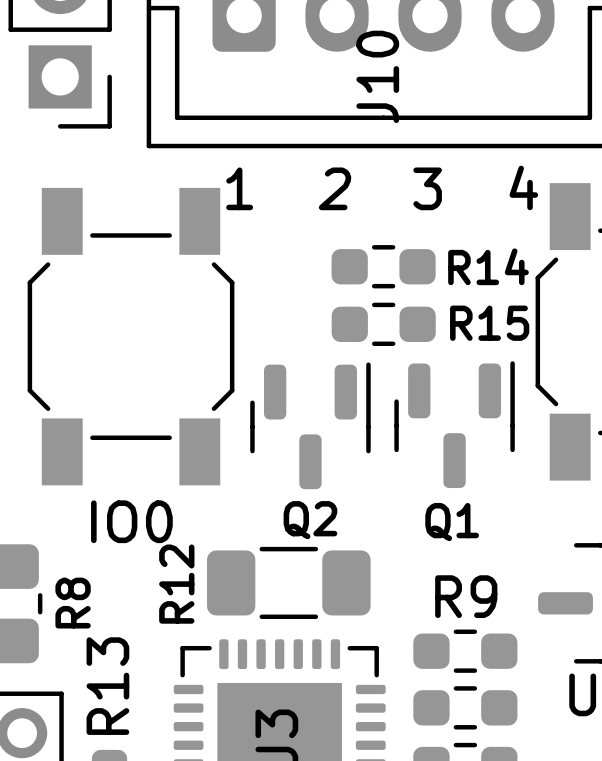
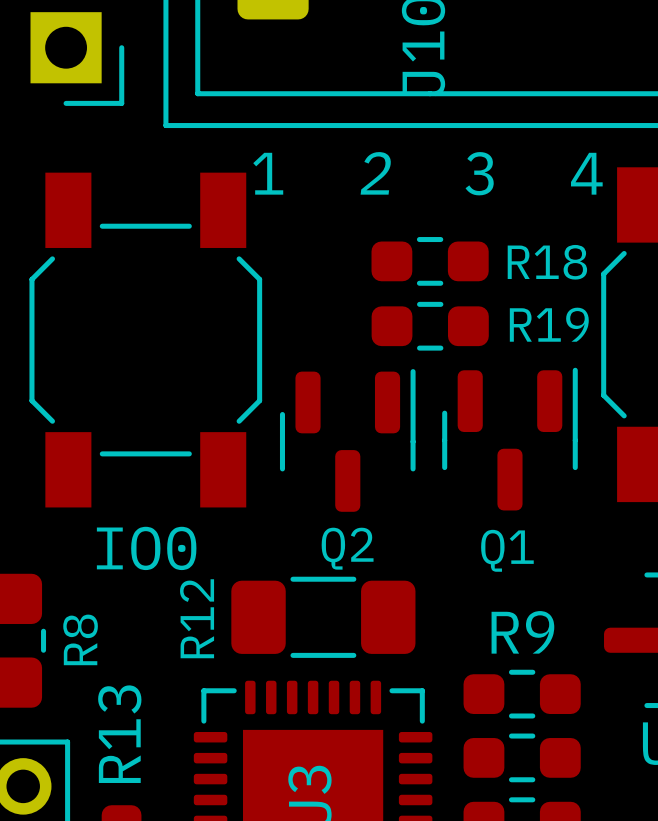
R14 name: R14 (488, 266) -> R18 (547, 262)
R15 name: R15 (489, 323) -> R19 (549, 324)

